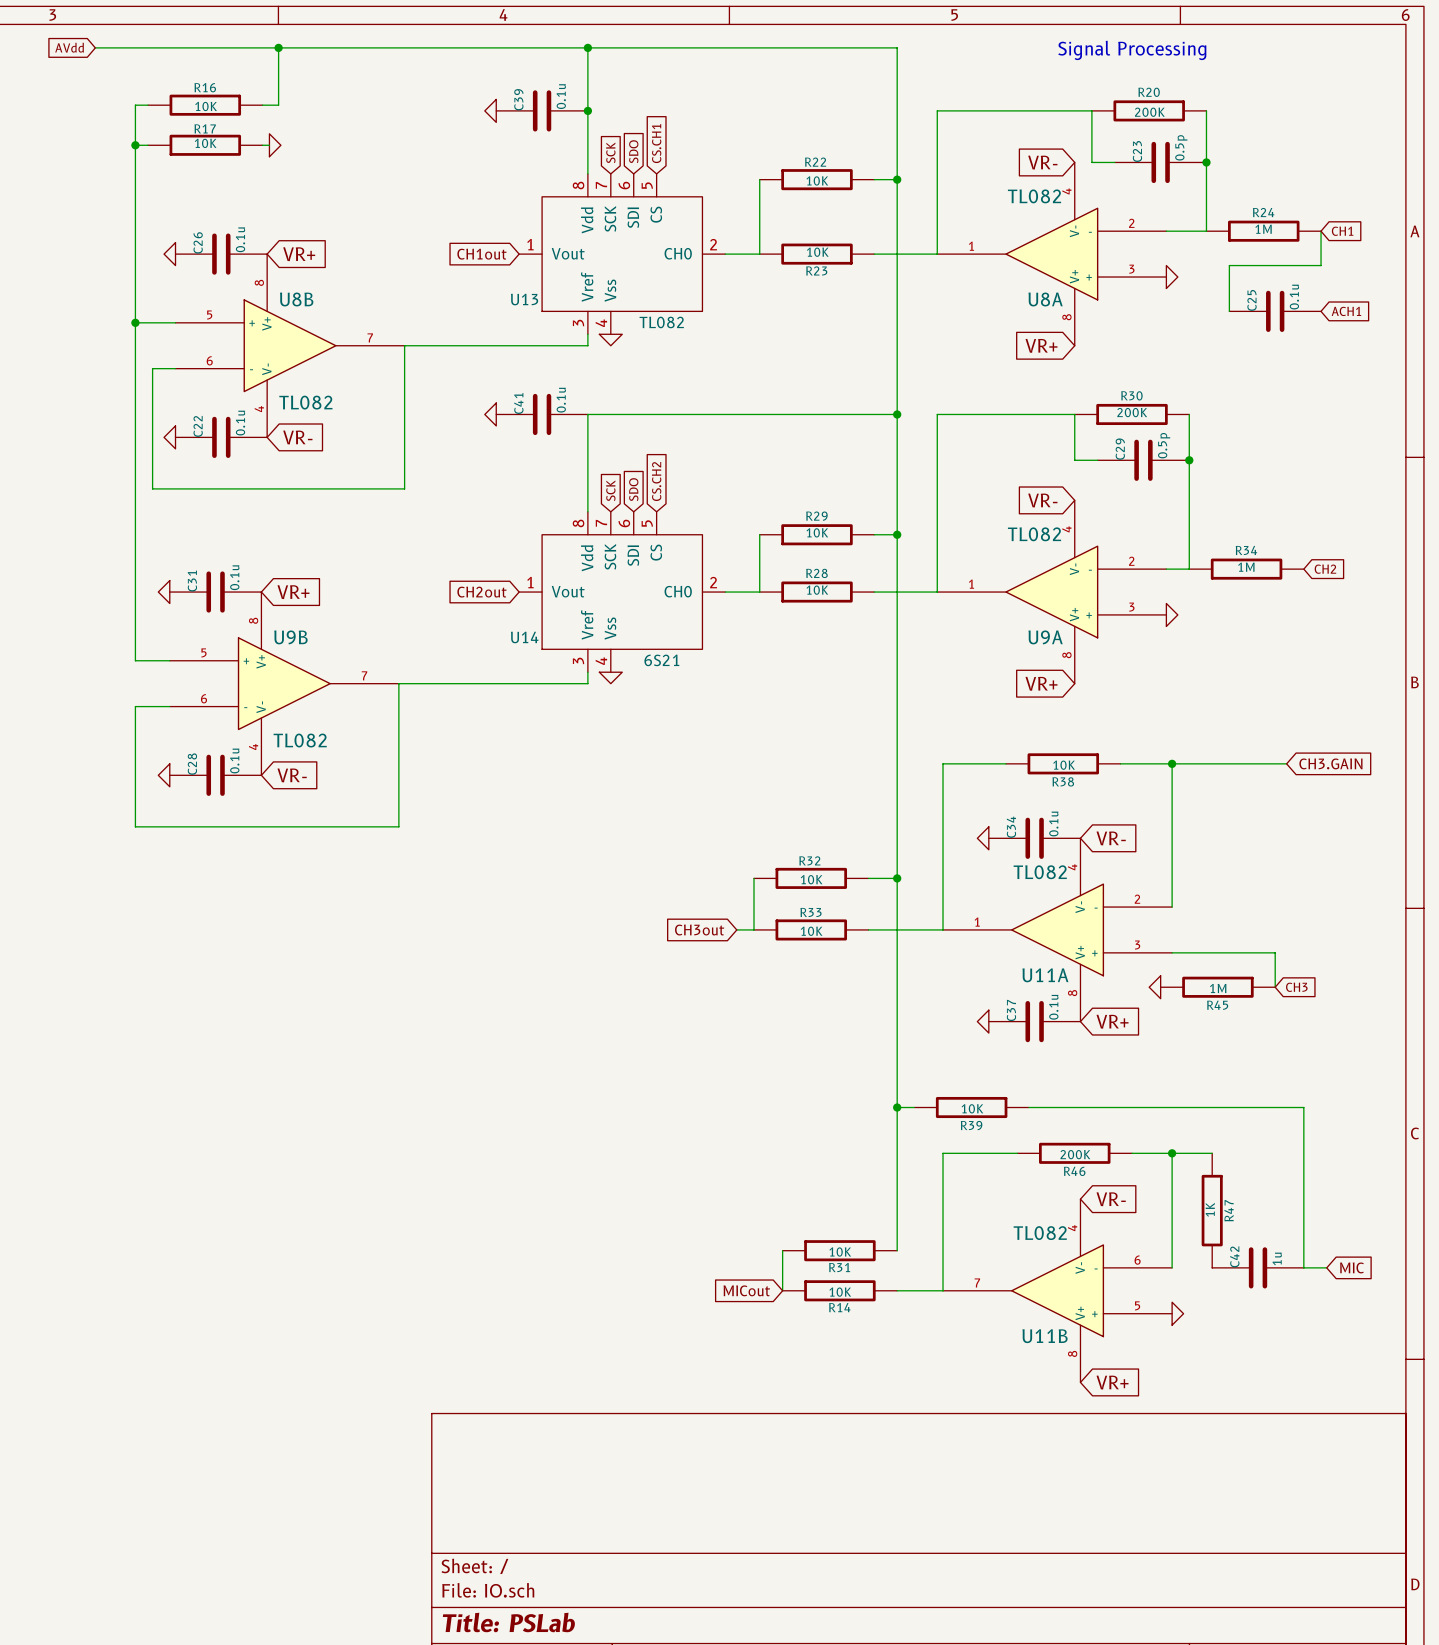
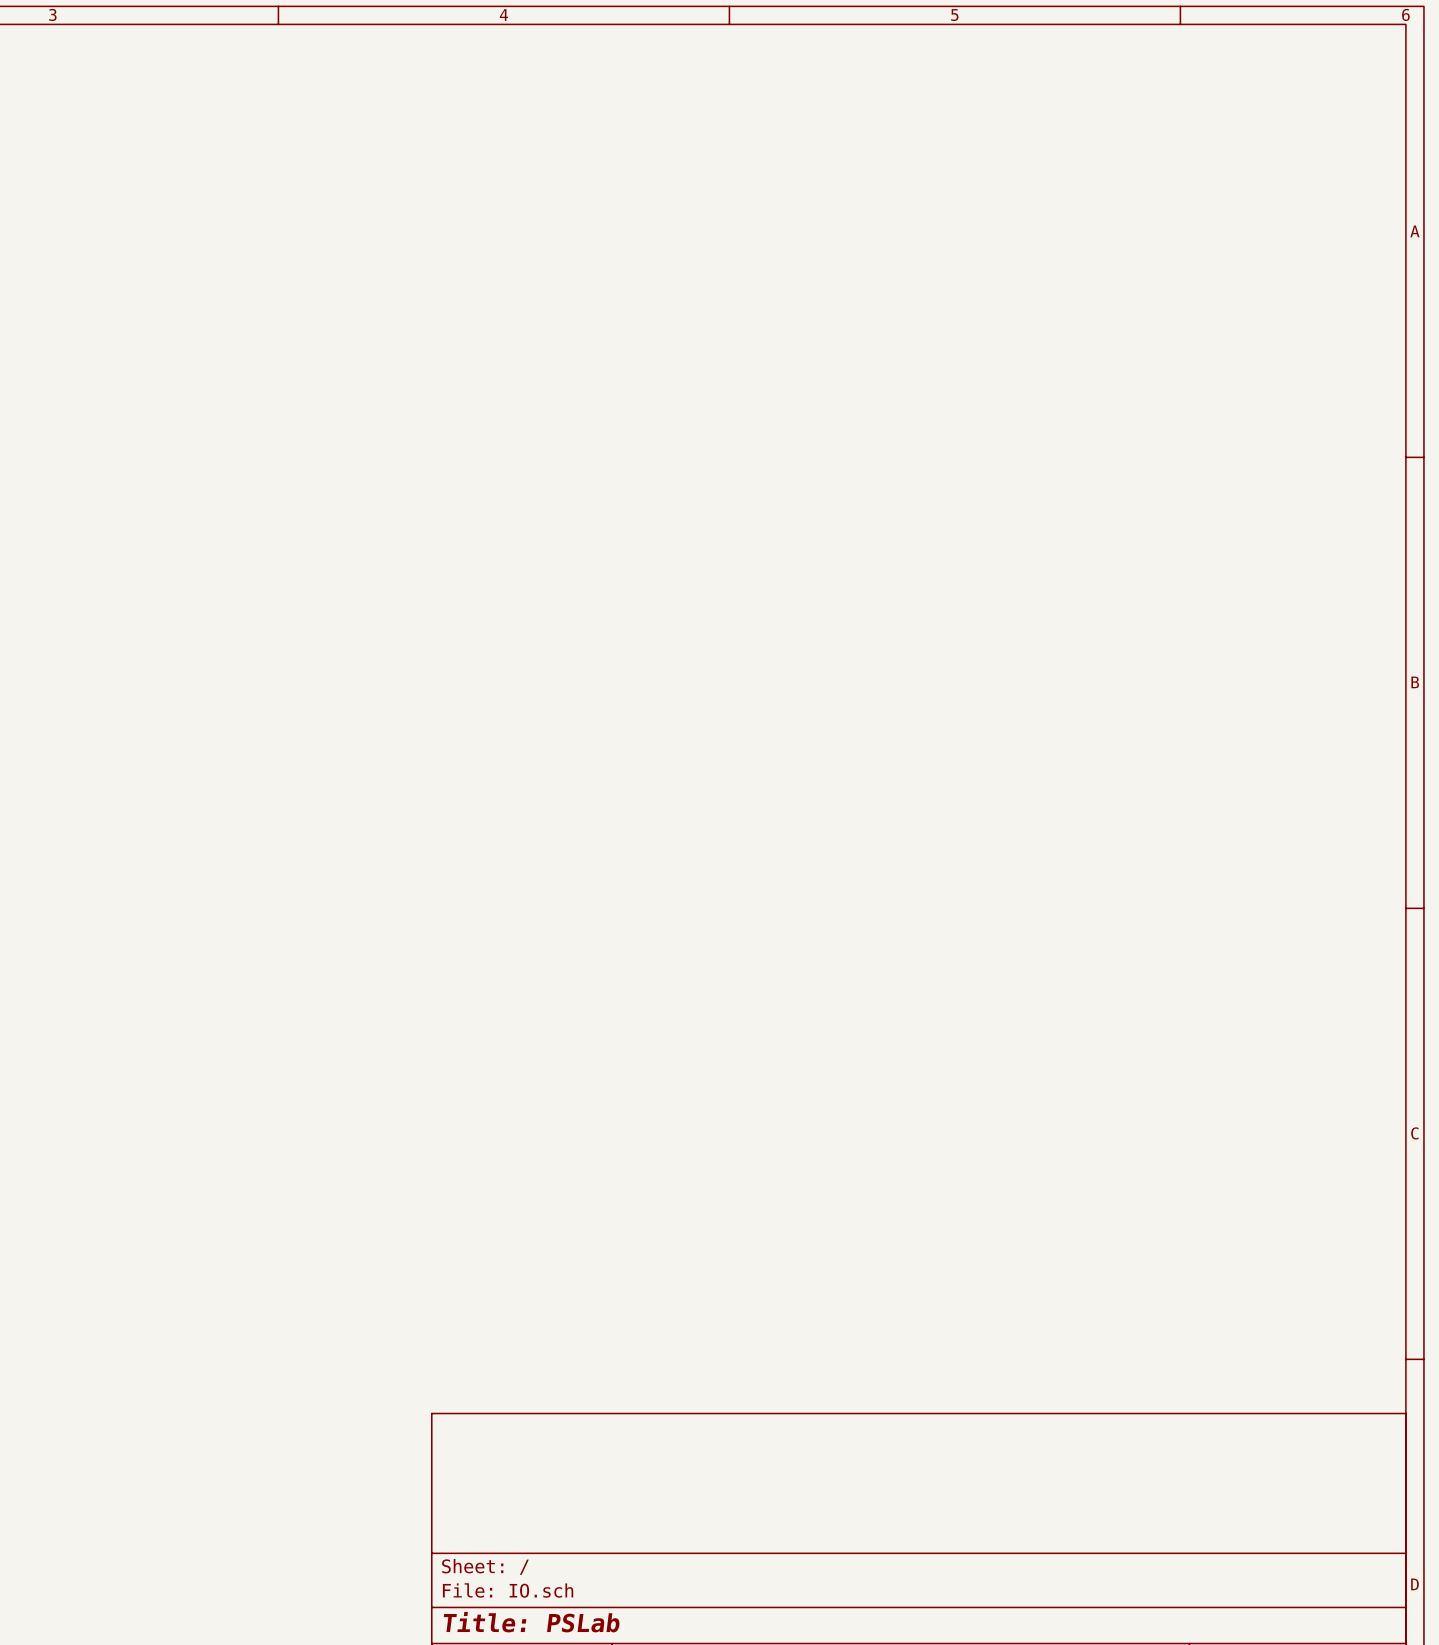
global label: AVdd (69, 47) -> none
wire: (95, 47) (897, 47) (897, 1250) -> none
wire: (278, 47) (278, 105) (262, 105) -> none
junction: (278, 47) -> none
wire: (587, 47) (587, 173) -> none
junction: (587, 47) -> none
text: Signal Processing (1132, 50) -> none
wire: (148, 105) (135, 105) (135, 660) (169, 660) -> none
R16: 10K (205, 105) -> none
power symbol: (490, 110) -> none
C39: 0.1u (542, 110) -> none
junction: (587, 110) -> none
R20: 200K (1149, 110) -> none
wire: (1206, 110) (1206, 231) (1166, 231) -> none
global label: CS.CH1 (656, 143) -> none
wire: (135, 145) (148, 145) -> none
junction: (135, 145) -> none
R17: 10K (205, 145) -> none
wire: (262, 145) (269, 145) -> none
power symbol: (275, 145) -> none
global label: SDO (633, 151) -> none
global label: SCK (610, 152) -> none
global label: VR- (1042, 162) -> none
wire: (1114, 162) (1091, 162) (1091, 110) (937, 110) (937, 254) (874, 254) -> none
C23: 0.5p (1160, 162) -> none
junction: (1206, 162) -> none
wire: (759, 179) (759, 254) (725, 254) -> none
R22: 10K (817, 179) -> none
wire: (874, 179) (897, 179) -> none
junction: (897, 179) -> none
R24: 1M (1263, 231) -> none
wire: (1321, 231) (1321, 265) (1229, 265) (1229, 311) -> none
global label: CH1 (1342, 231) -> none
power symbol: (169, 254) -> none
C26: 0.1u (221, 254) -> none
global label: VR+ (299, 254) -> none
global label: CH1out (481, 254) -> none
U13: TL082 (622, 254) -> none
R23: 10K (817, 254) -> none
U8A: TL082 (1051, 254) -> none
power symbol: (1172, 277) -> none
C25: 0.1u (1275, 311) -> none
global label: ACH1 (1346, 311) -> none
wire: (135, 322) (175, 322) -> none
junction: (135, 322) -> none
wire: (587, 334) (587, 345) (404, 345) (404, 488) (152, 488) (152, 368) (175, 368) -> none
power symbol: (610, 340) -> none
U8B: TL082 (290, 345) -> none
global label: VR+ (1041, 345) -> none
power symbol: (490, 414) -> none
C41: 0.1u (542, 414) -> none
wire: (897, 414) (587, 414) (587, 511) -> none
junction: (897, 414) -> none
R30: 200K (1132, 414) -> none
wire: (1189, 414) (1189, 569) (1166, 569) -> none
power symbol: (169, 437) -> none
C22: 0.1u (221, 437) -> none
global label: VR- (297, 437) -> none
wire: (1097, 460) (1074, 460) (1074, 414) (937, 414) (937, 592) (874, 592) -> none
C29: 0.5p (1143, 460) -> none
junction: (1189, 460) -> none
global label: CS.CH2 (656, 481) -> none
global label: SDO (633, 489) -> none
global label: SCK (610, 490) -> none
global label: VR- (1042, 500) -> none
wire: (759, 534) (759, 592) (725, 592) -> none
R29: 10K (817, 534) -> none
wire: (874, 534) (897, 534) -> none
junction: (897, 534) -> none
R34: 1M (1246, 569) -> none
global label: CH2 (1325, 569) -> none
power symbol: (164, 592) -> none
C31: 0.1u (215, 592) -> none
global label: VR+ (293, 592) -> none
global label: CH2out (481, 592) -> none
U14: 6S21 (622, 592) -> none
R28: 10K (817, 592) -> none
U9A: TL082 (1051, 592) -> none
power symbol: (1172, 614) -> none
wire: (587, 672) (587, 683) (398, 683) (398, 826) (135, 826) (135, 706) (169, 706) -> none
power symbol: (610, 677) -> none
U9B: TL082 (284, 683) -> none
global label: VR+ (1041, 683) -> none
wire: (1006, 763) (943, 763) (943, 929) (868, 929) -> none
R38: 10K (1063, 763) -> none
wire: (1120, 763) (1286, 763) -> none
wire: (1172, 763) (1172, 907) -> none
junction: (1172, 763) -> none
global label: CH3.GAIN (1330, 763) -> none
power symbol: (164, 775) -> none
C28: 0.1u (215, 775) -> none
global label: VR- (292, 775) -> none
power symbol: (983, 838) -> none
C34: 0.1u (1034, 838) -> none
global label: VR- (1111, 838) -> none
wire: (753, 878) (753, 929) (736, 929) -> none
R32: 10K (811, 878) -> none
wire: (868, 878) (897, 878) -> none
junction: (897, 878) -> none
R33: 10K (811, 929) -> none
U11A: TL082 (1057, 929) -> none
global label: CH3out (699, 930) -> none
wire: (1172, 952) (1275, 952) (1275, 987) -> none
power symbol: (1154, 987) -> none
R45: 1M (1217, 987) -> none
global label: CH3 (1296, 987) -> none
power symbol: (983, 1021) -> none
C37: 0.1u (1034, 1021) -> none
global label: VR+ (1112, 1021) -> none
wire: (897, 1107) (914, 1107) -> none
junction: (897, 1107) -> none
R39: 10K (971, 1107) -> none
wire: (1028, 1107) (1303, 1107) (1303, 1267) (1326, 1267) -> none
wire: (1017, 1153) (943, 1153) (943, 1290) (897, 1290) -> none
R46: 200K (1074, 1153) -> none
wire: (1132, 1153) (1212, 1153) -> none
wire: (1172, 1153) (1172, 1267) -> none
junction: (1172, 1153) -> none
global label: VR- (1111, 1199) -> none
R47: 1K (1212, 1210) -> none
wire: (782, 1250) (782, 1290) -> none
R31: 10K (839, 1250) -> none
C42: 1u (1258, 1267) -> none
global label: MIC (1351, 1267) -> none
global label: MICout (746, 1290) -> none
R14: 10K (839, 1290) -> none
U11B: TL082 (1057, 1290) -> none
power symbol: (1177, 1313) -> none
global label: VR+ (1112, 1382) -> none

